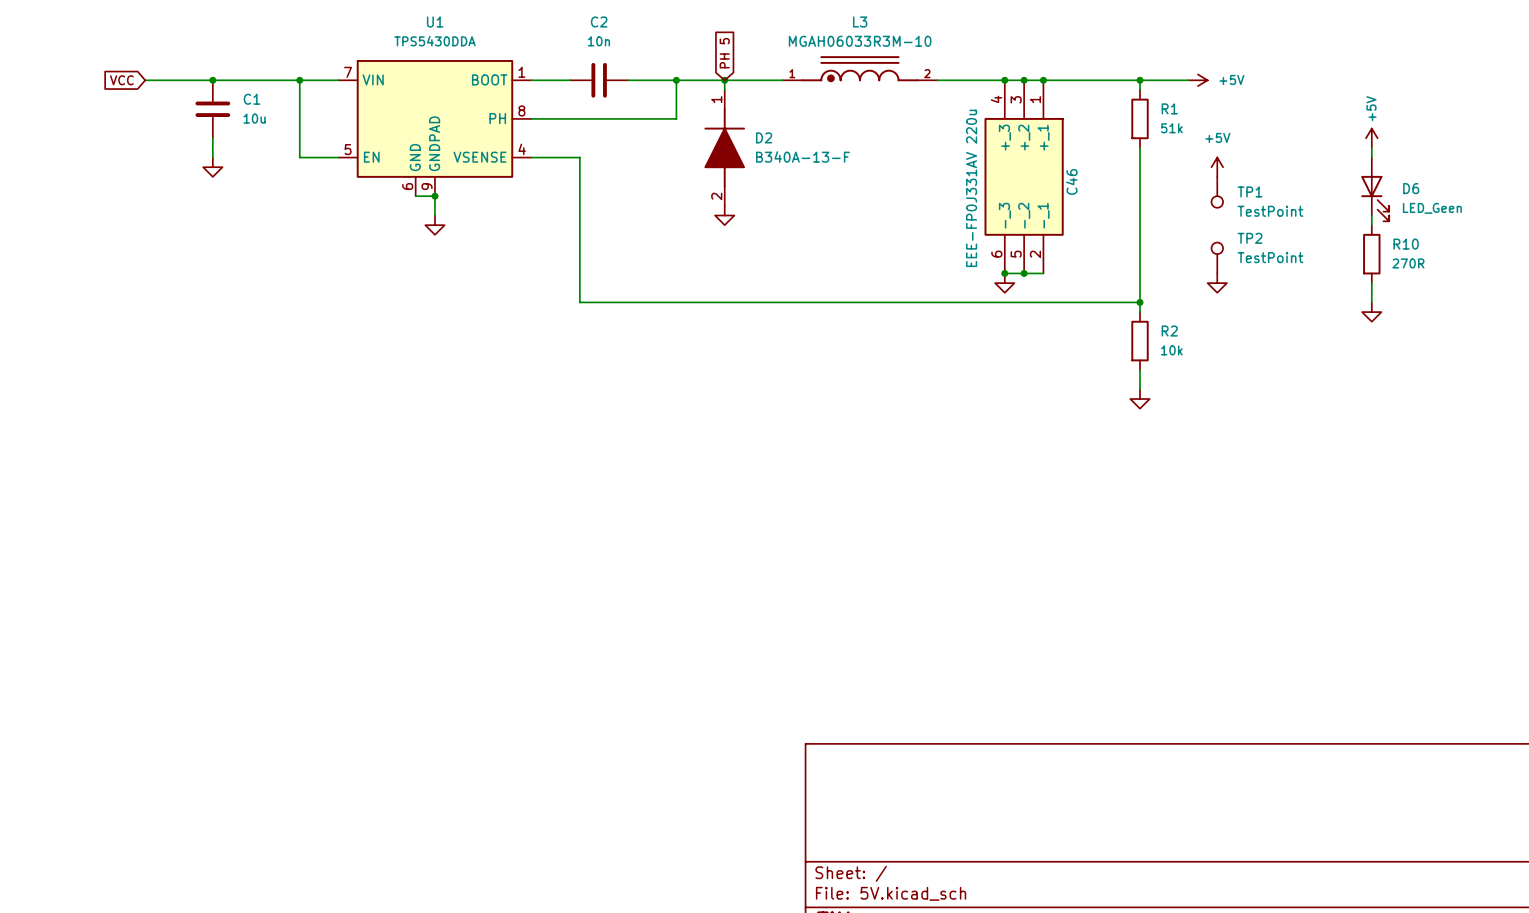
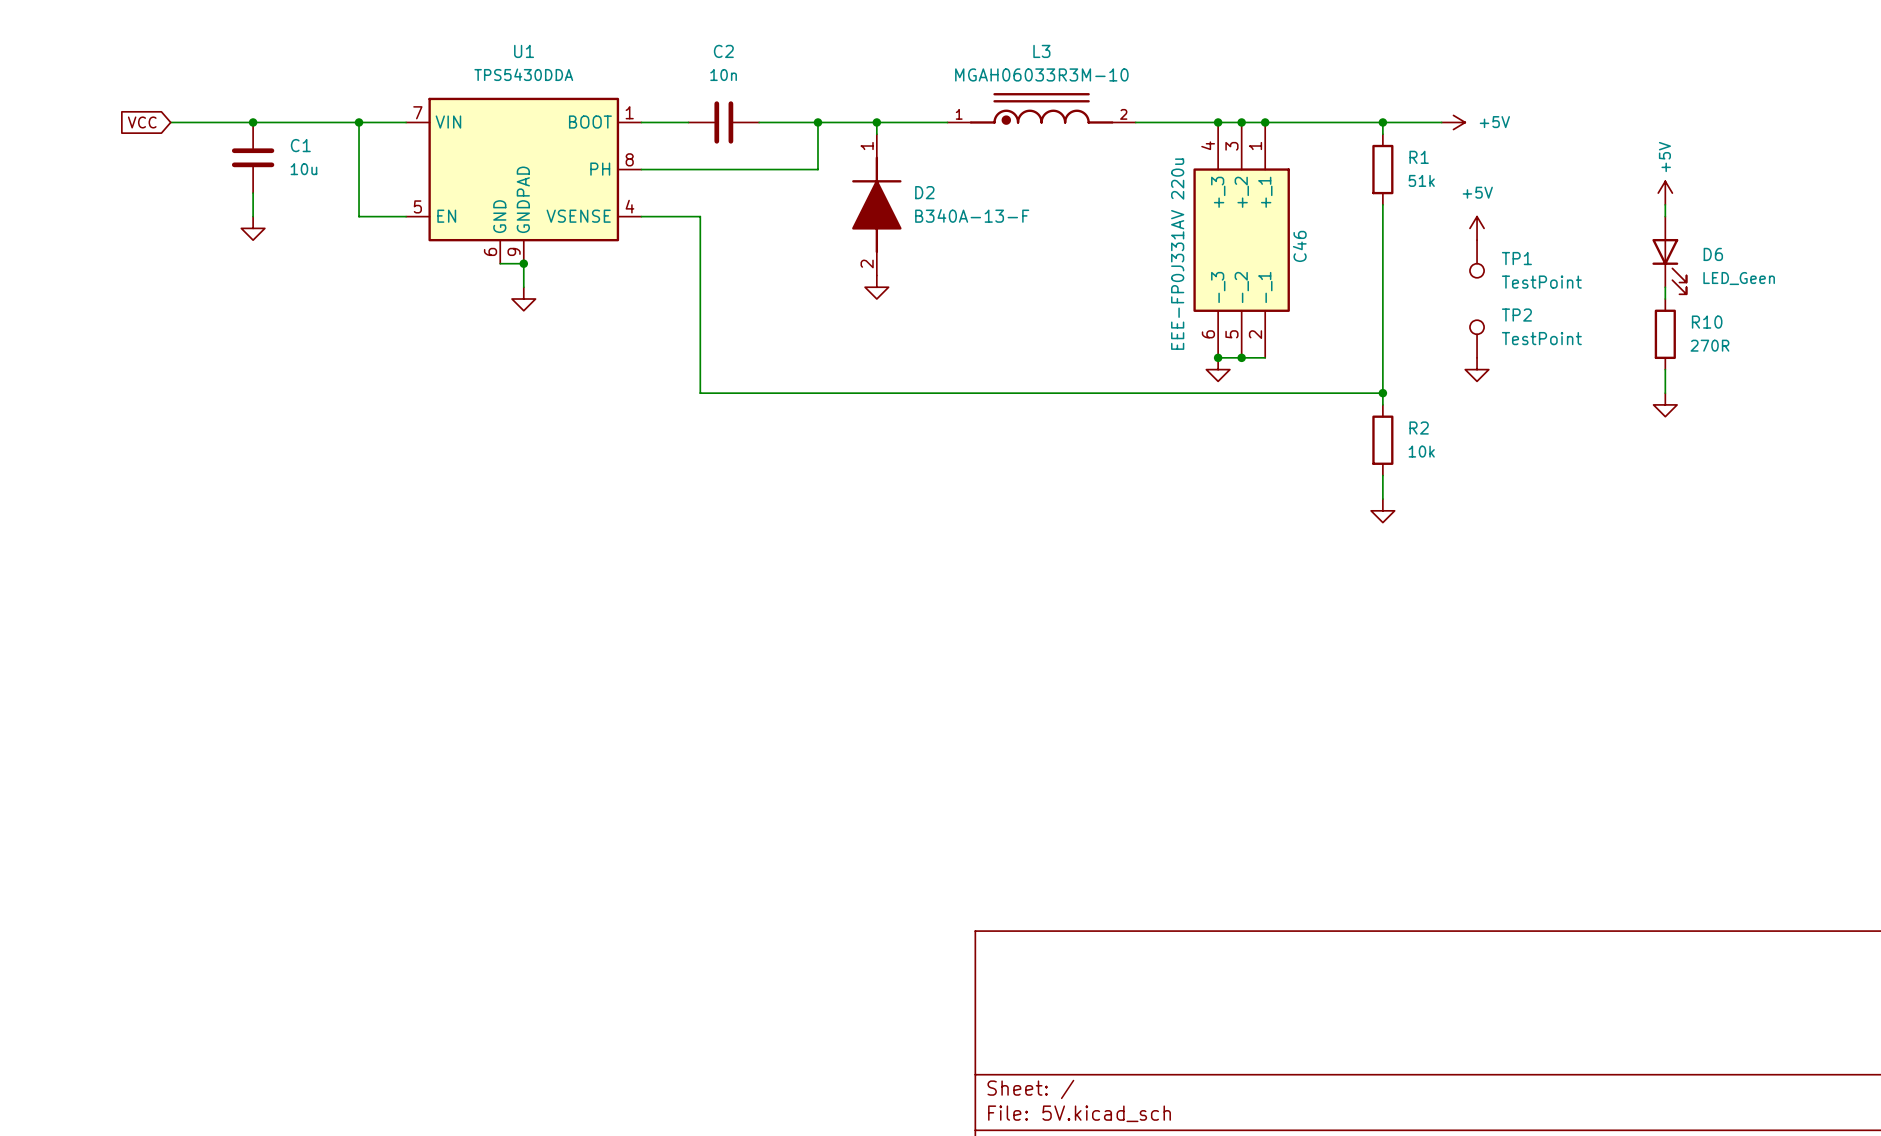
global label: PH 5 (724, 53) -> none

